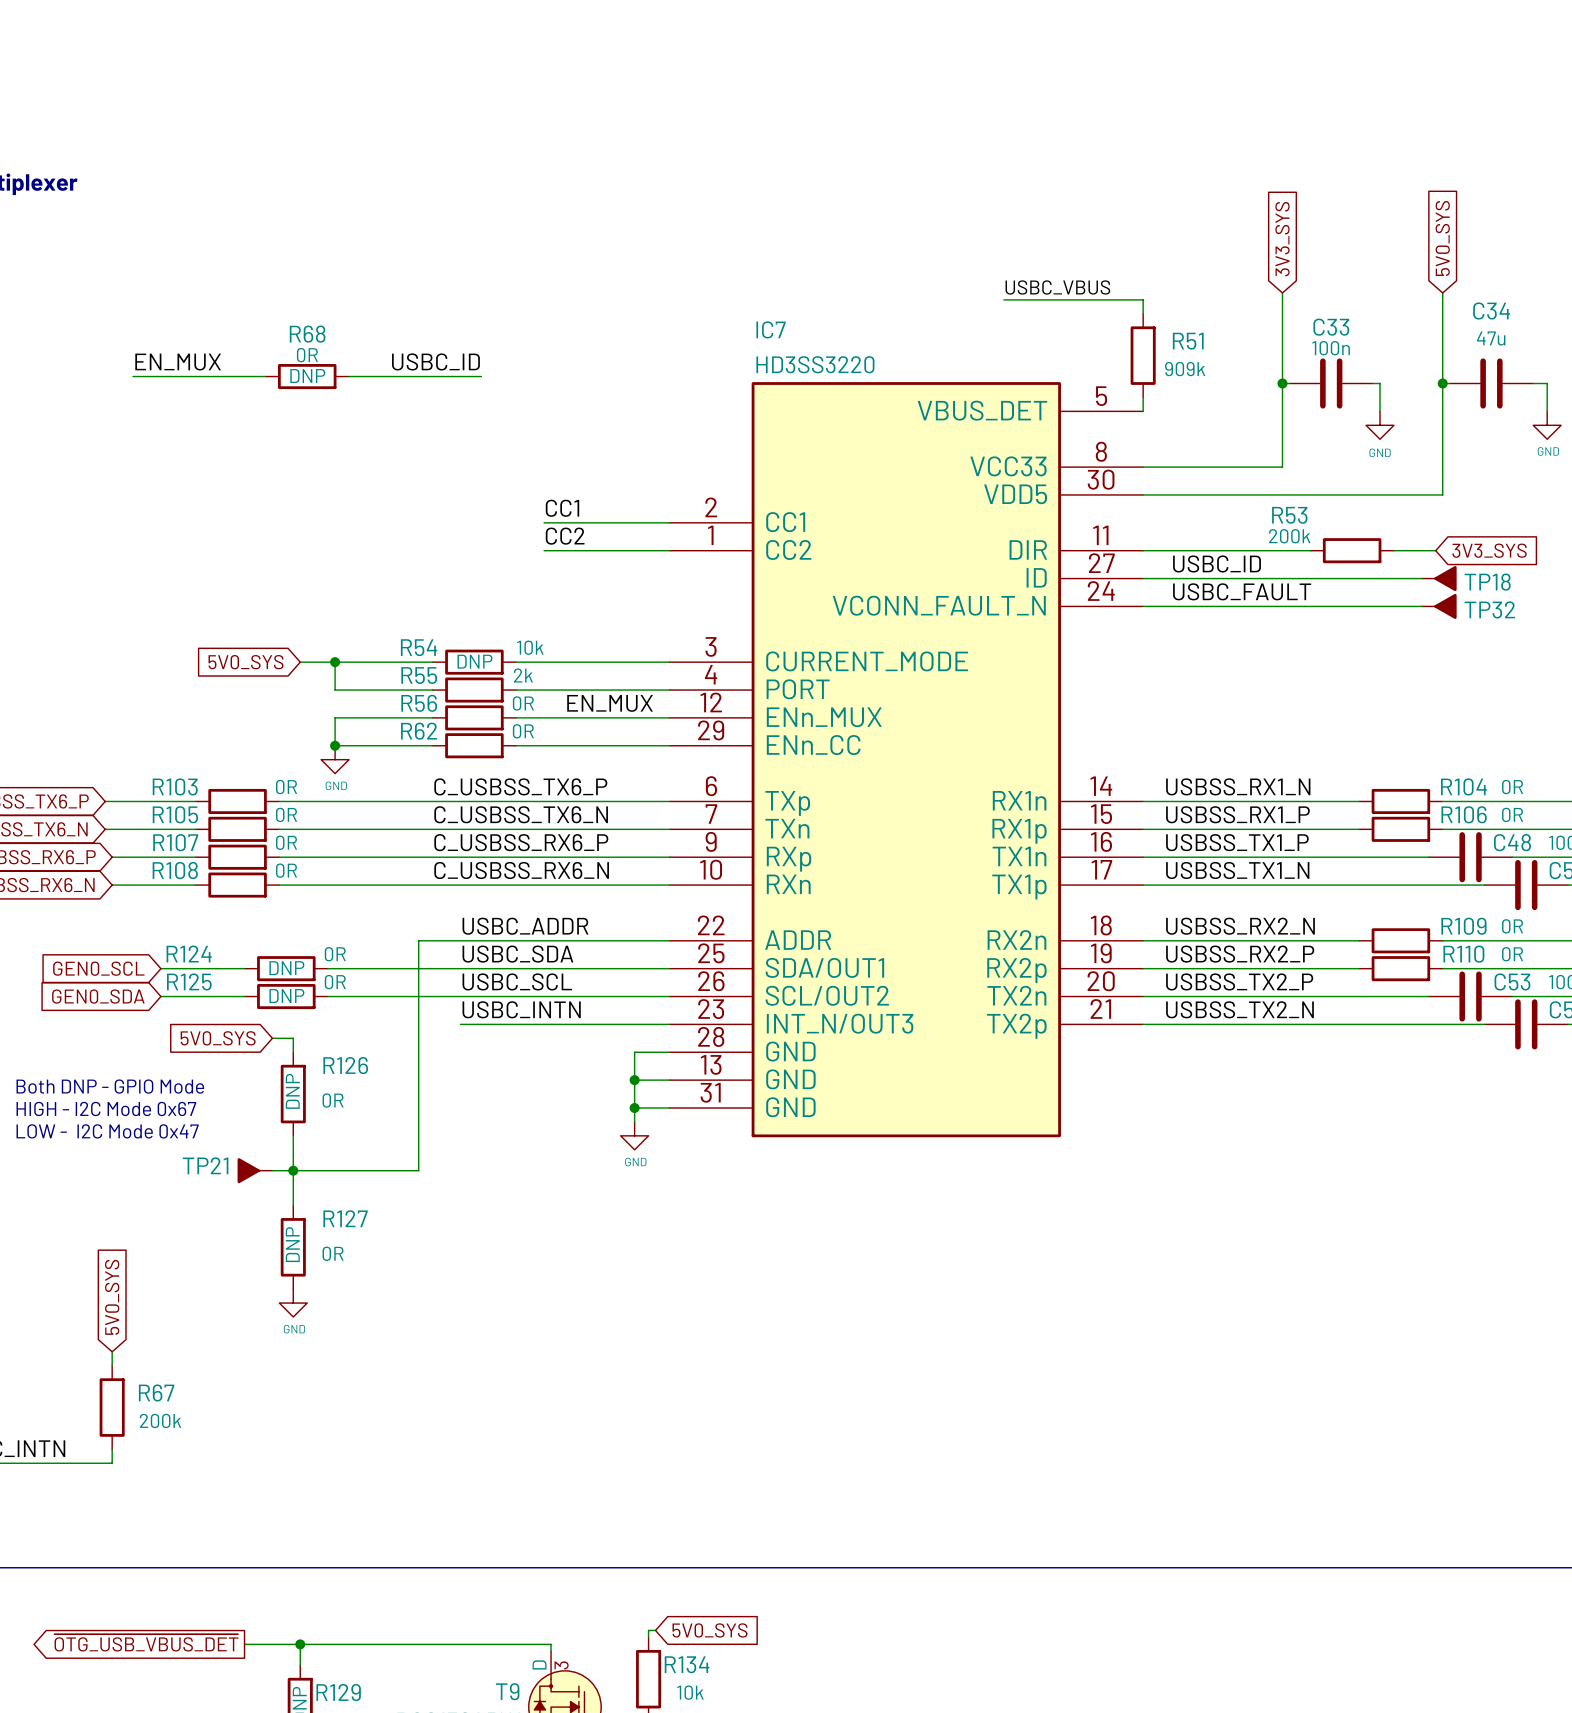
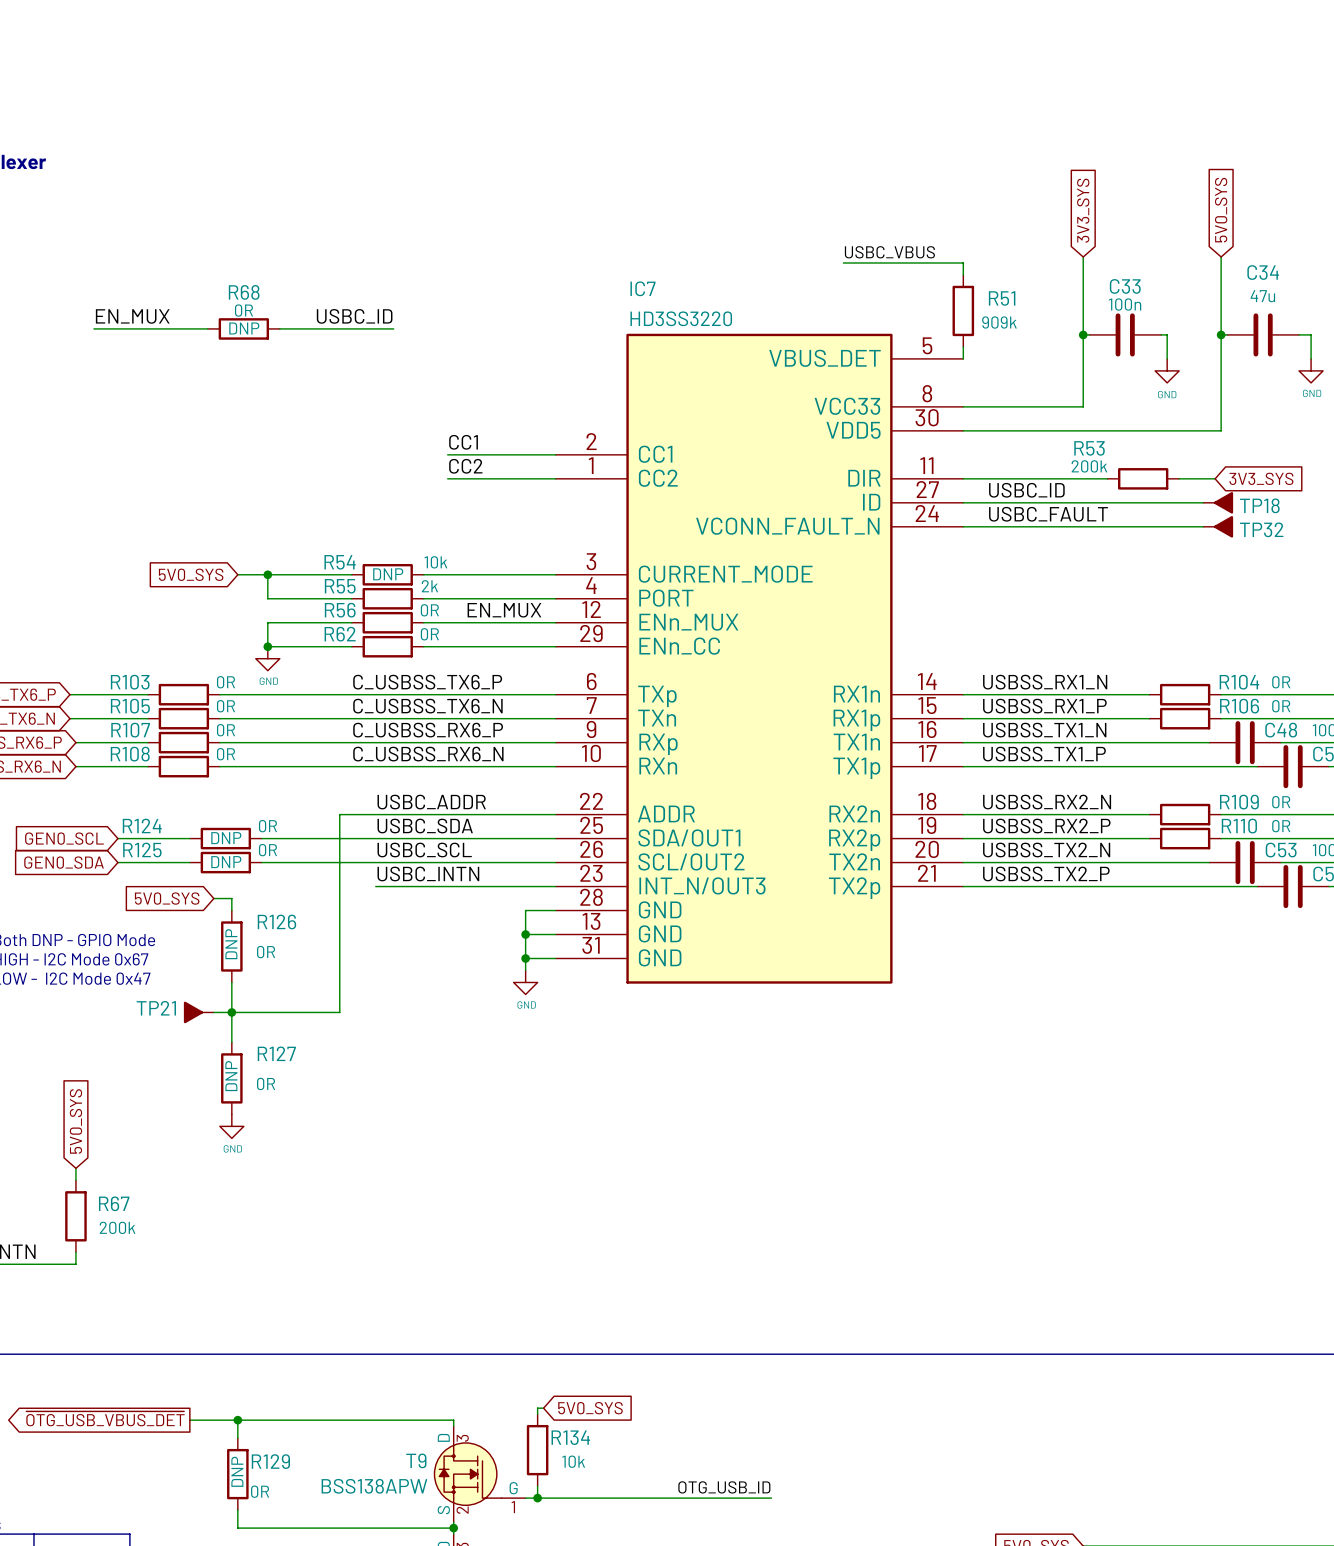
label: USBSS_TX1_P (1237, 842) -> USBSS_TX1_N (1044, 730)
label: USBSS_TX1_N (1237, 870) -> USBSS_TX1_P (1044, 754)
label: USBSS_TX2_P (1239, 981) -> USBSS_TX2_N (1046, 850)
label: USBSS_TX2_N (1239, 1009) -> USBSS_TX2_P (1046, 873)

